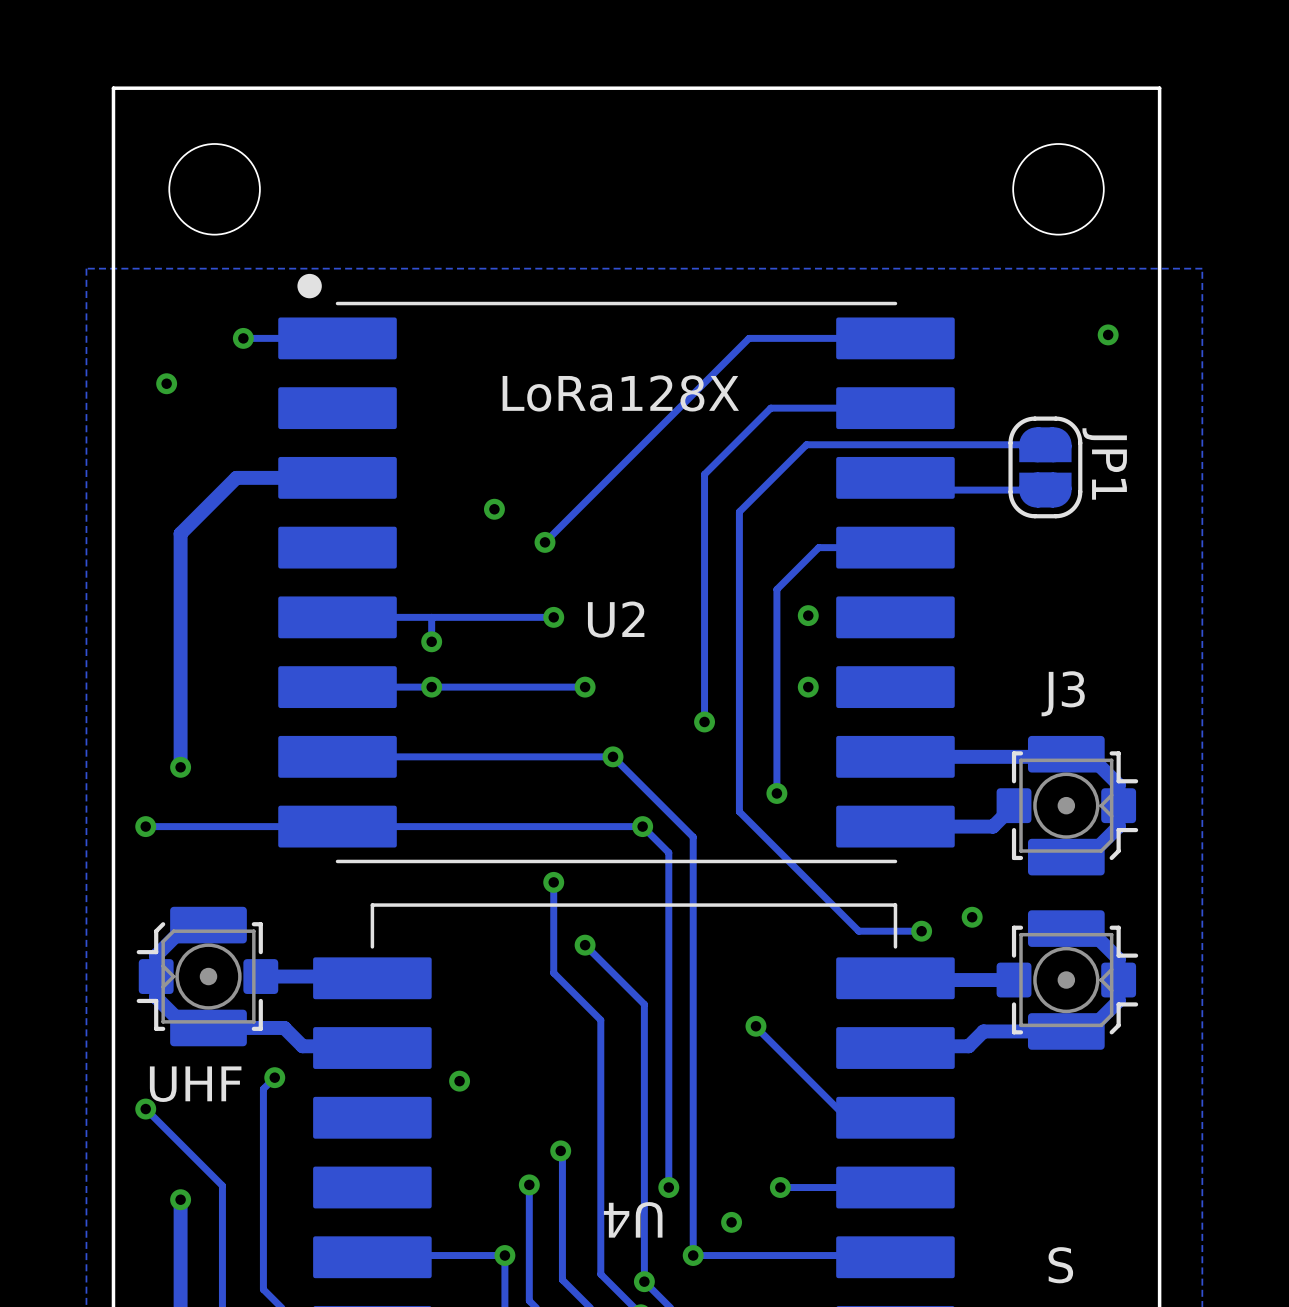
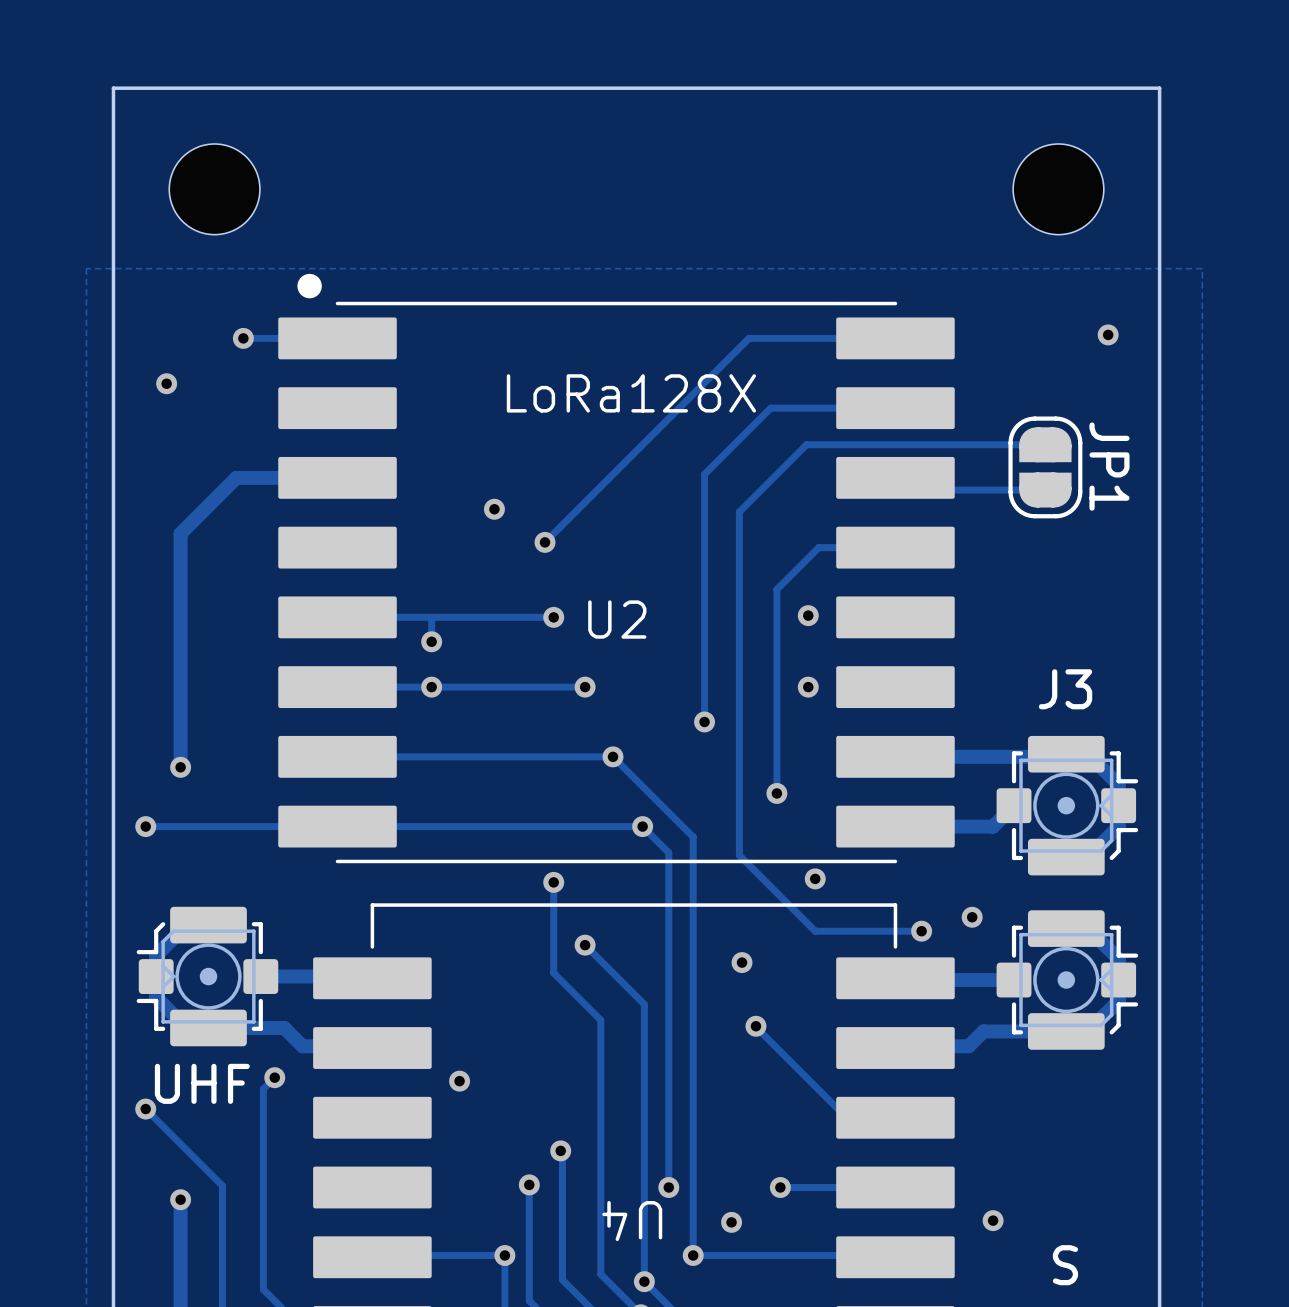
track: (739, 811) (858, 931) -> (739, 811) (739, 855) (815, 931) (858, 931)
via: none -> (815, 878)
via: none -> (742, 962)
via: none -> (993, 1220)

